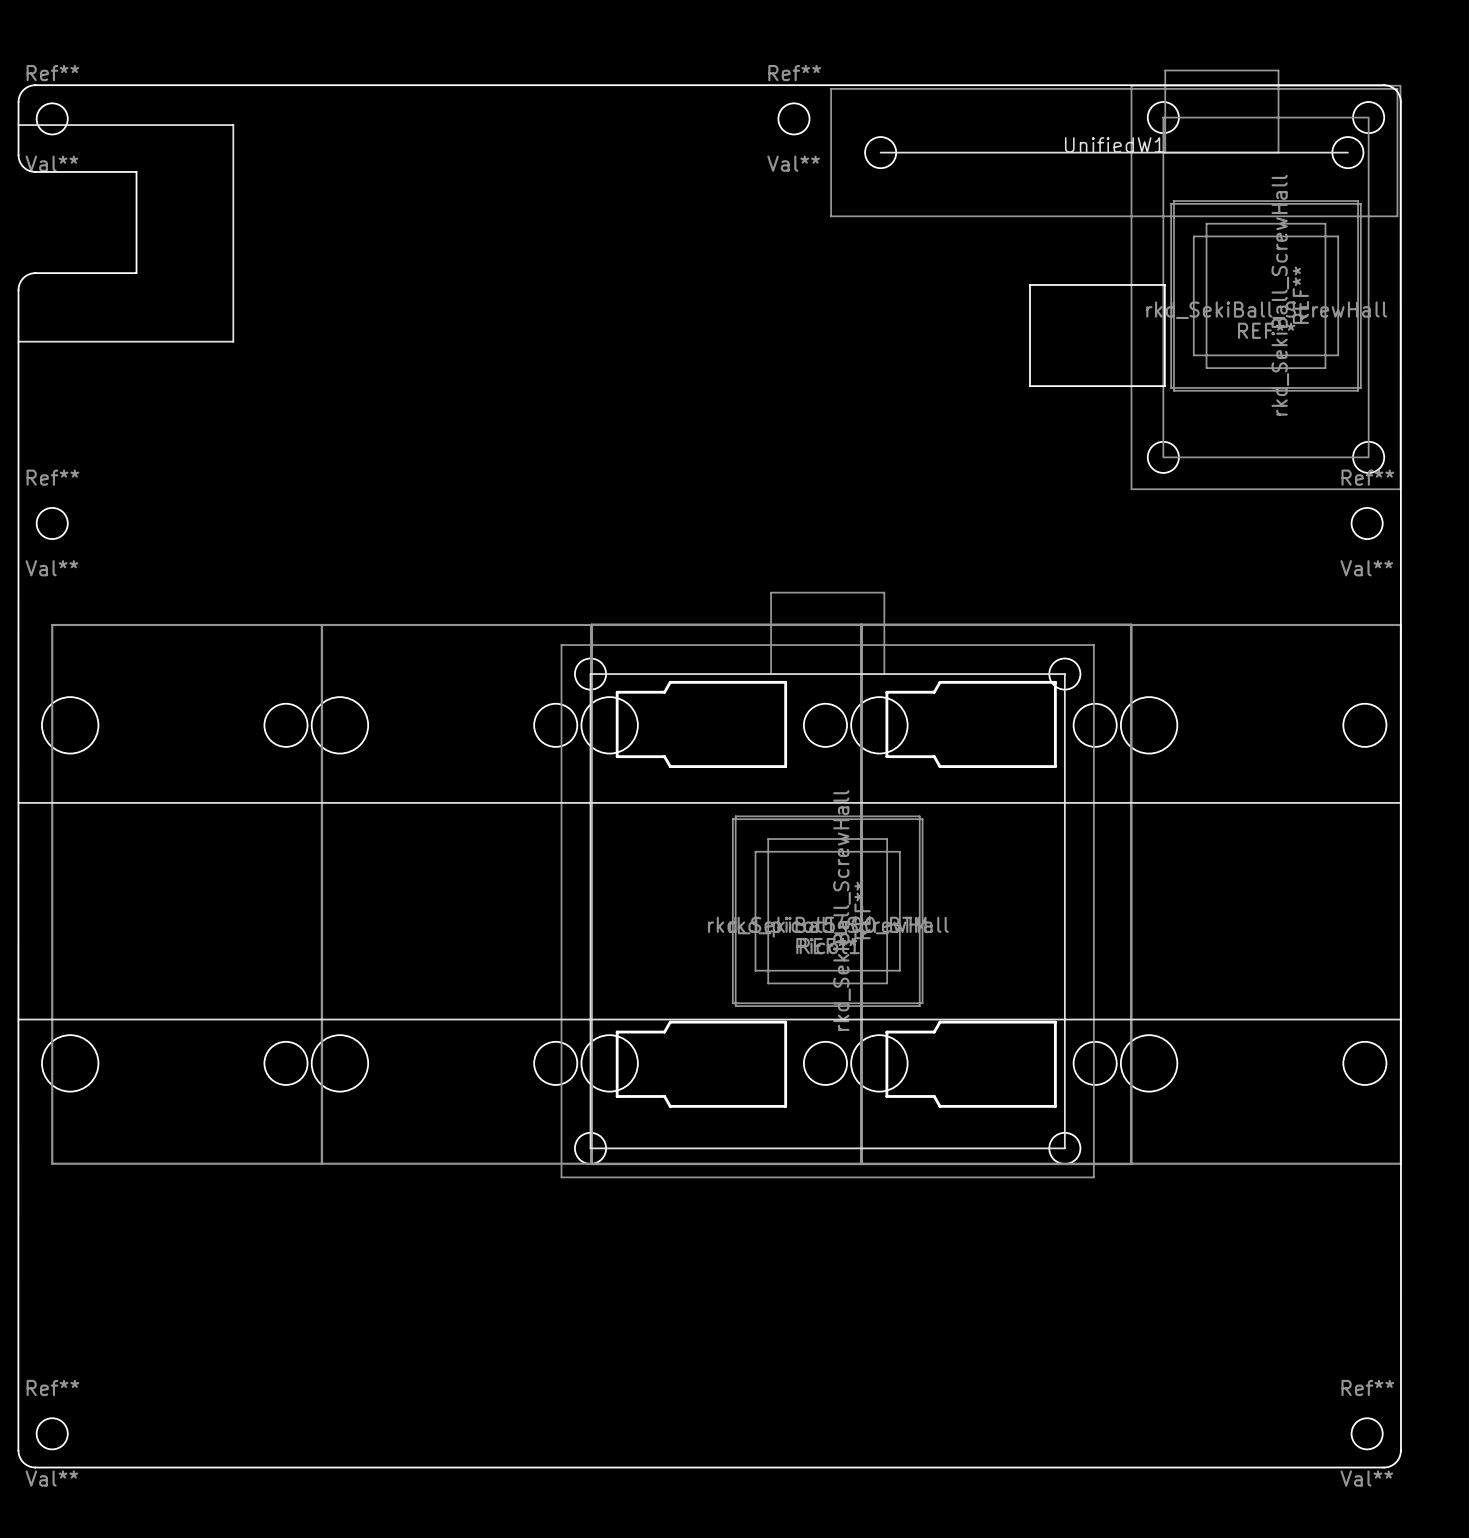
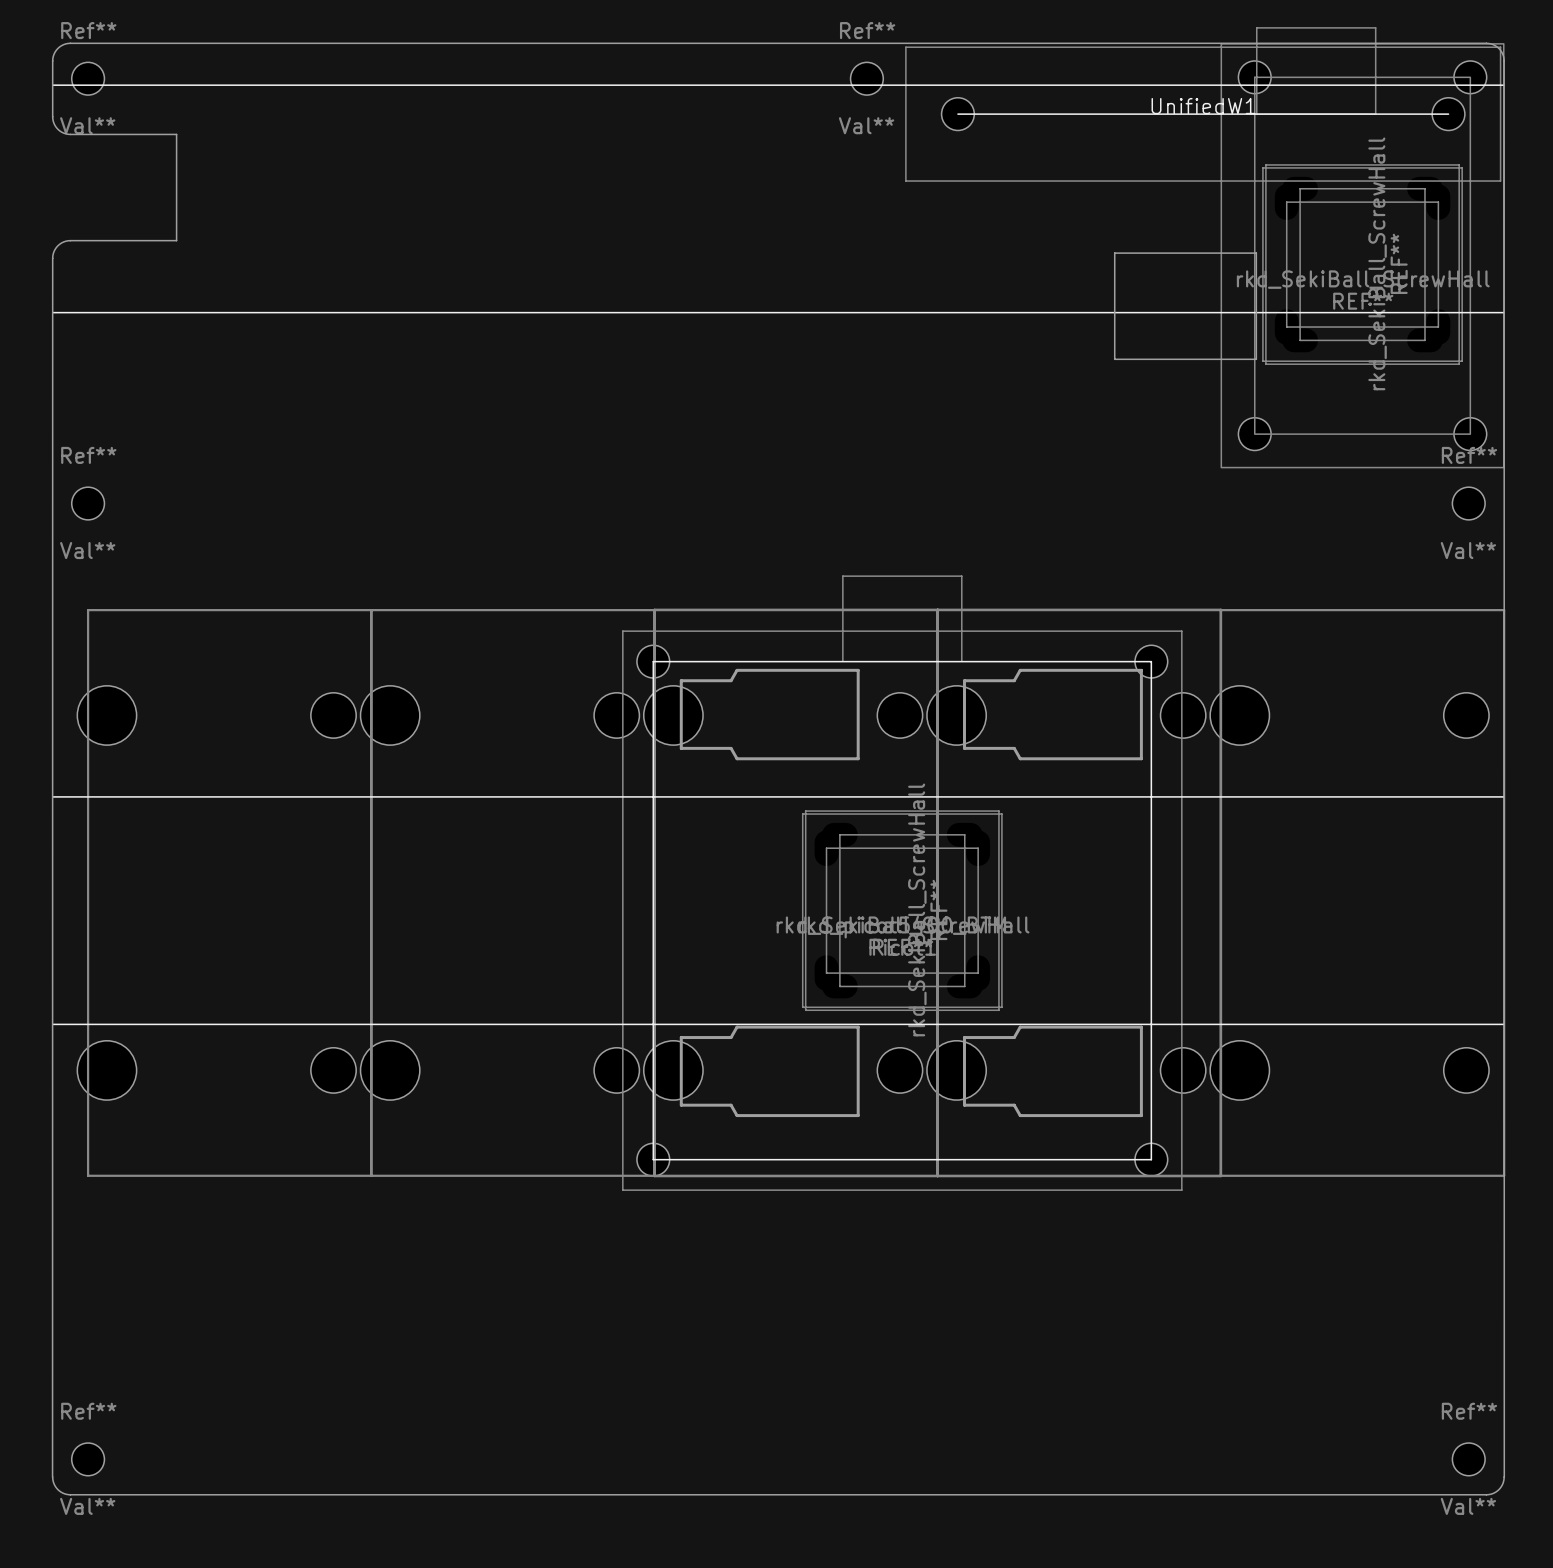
line: (233, 125) (233, 341) -> (278, 85) (1504, 85)
line: none -> (278, 312) (1504, 312)

